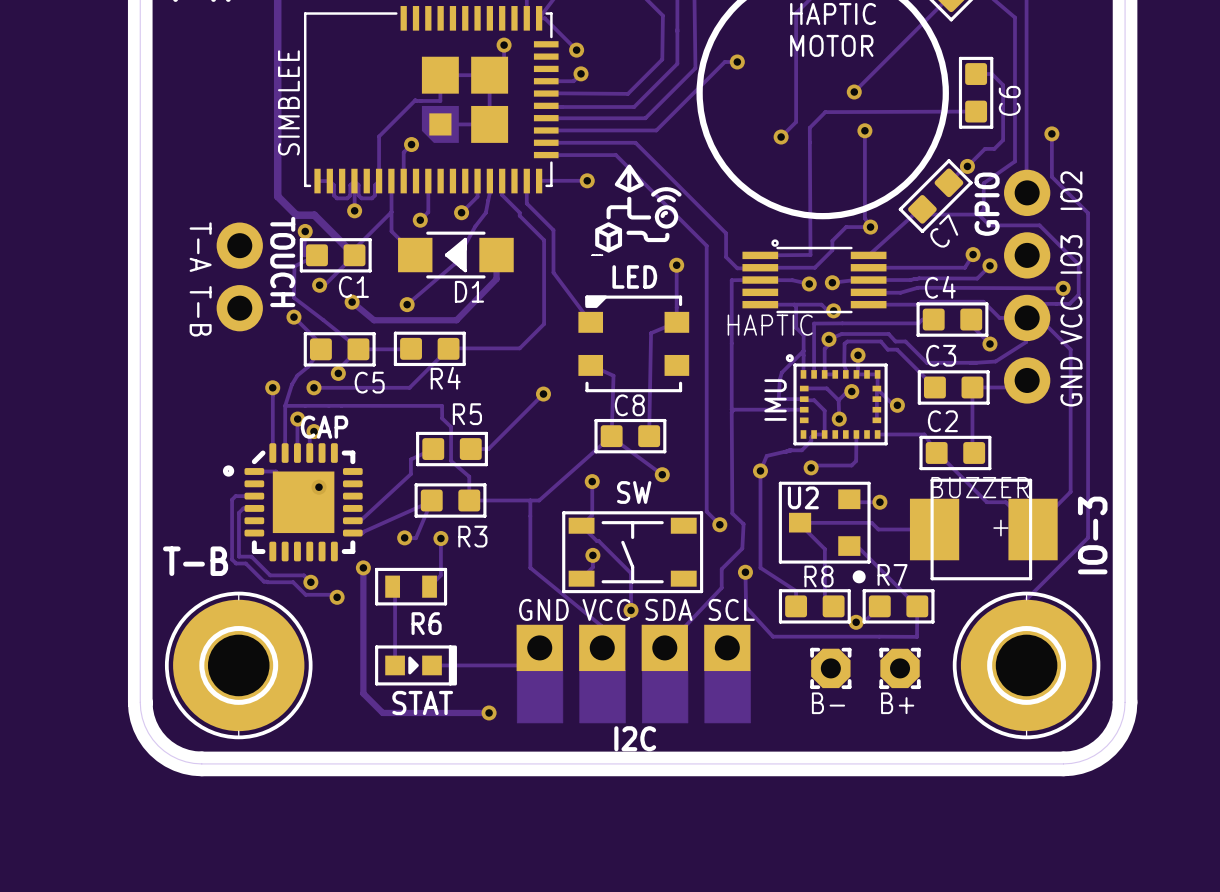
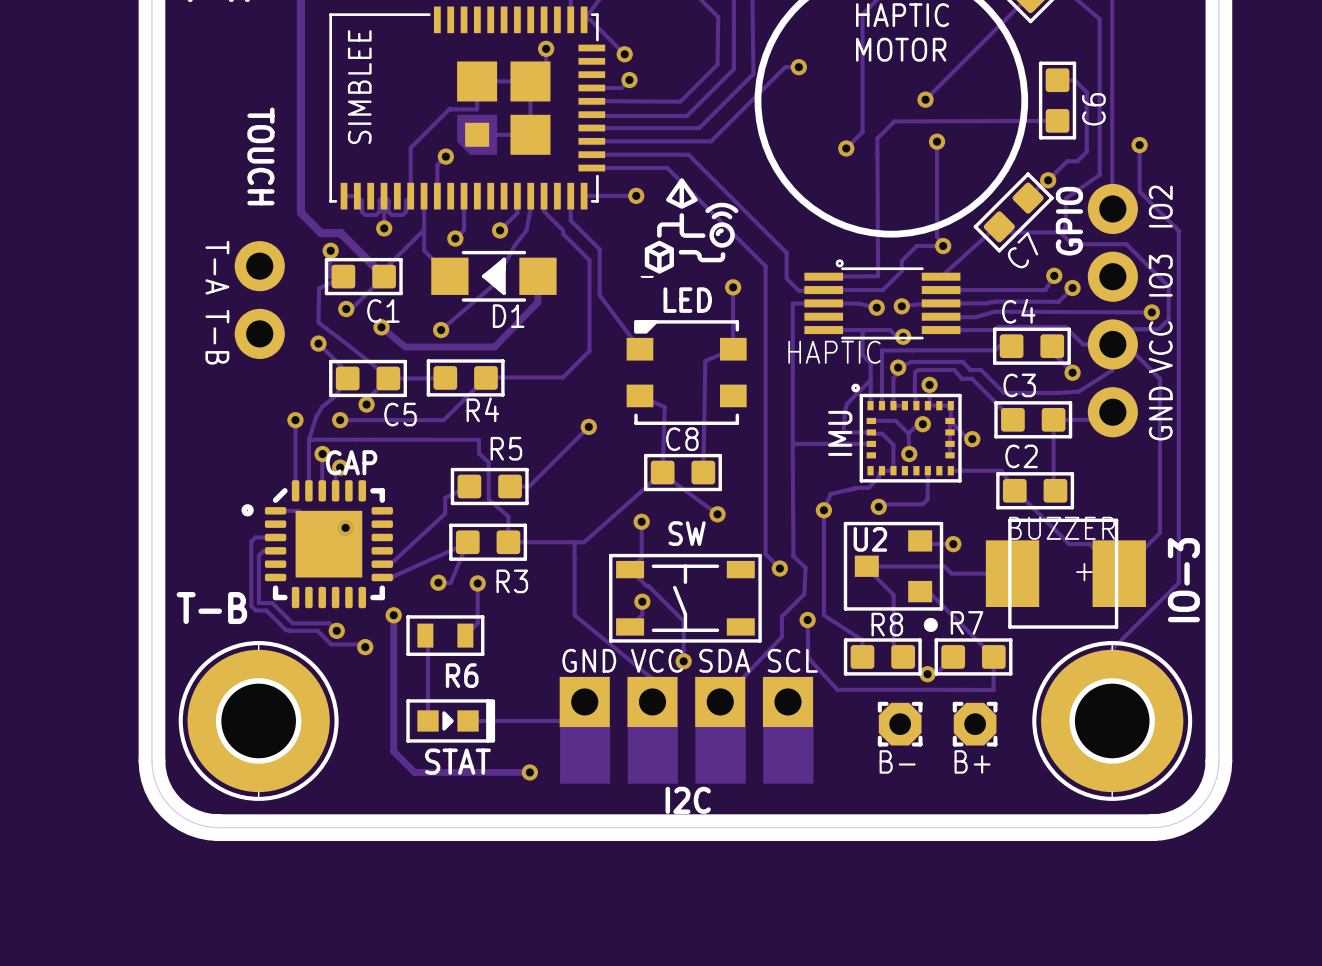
SIMBLEE name position: SIMBLEE (288, 102) -> SIMBLEE (359, 87)
TOUCH name position: TOUCH (282, 261) -> TOUCH (260, 156)
part footprint: [164, 591, 313, 740] -> [178, 641, 339, 801]
part footprint: [952, 591, 1101, 740] -> [1032, 641, 1193, 801]

